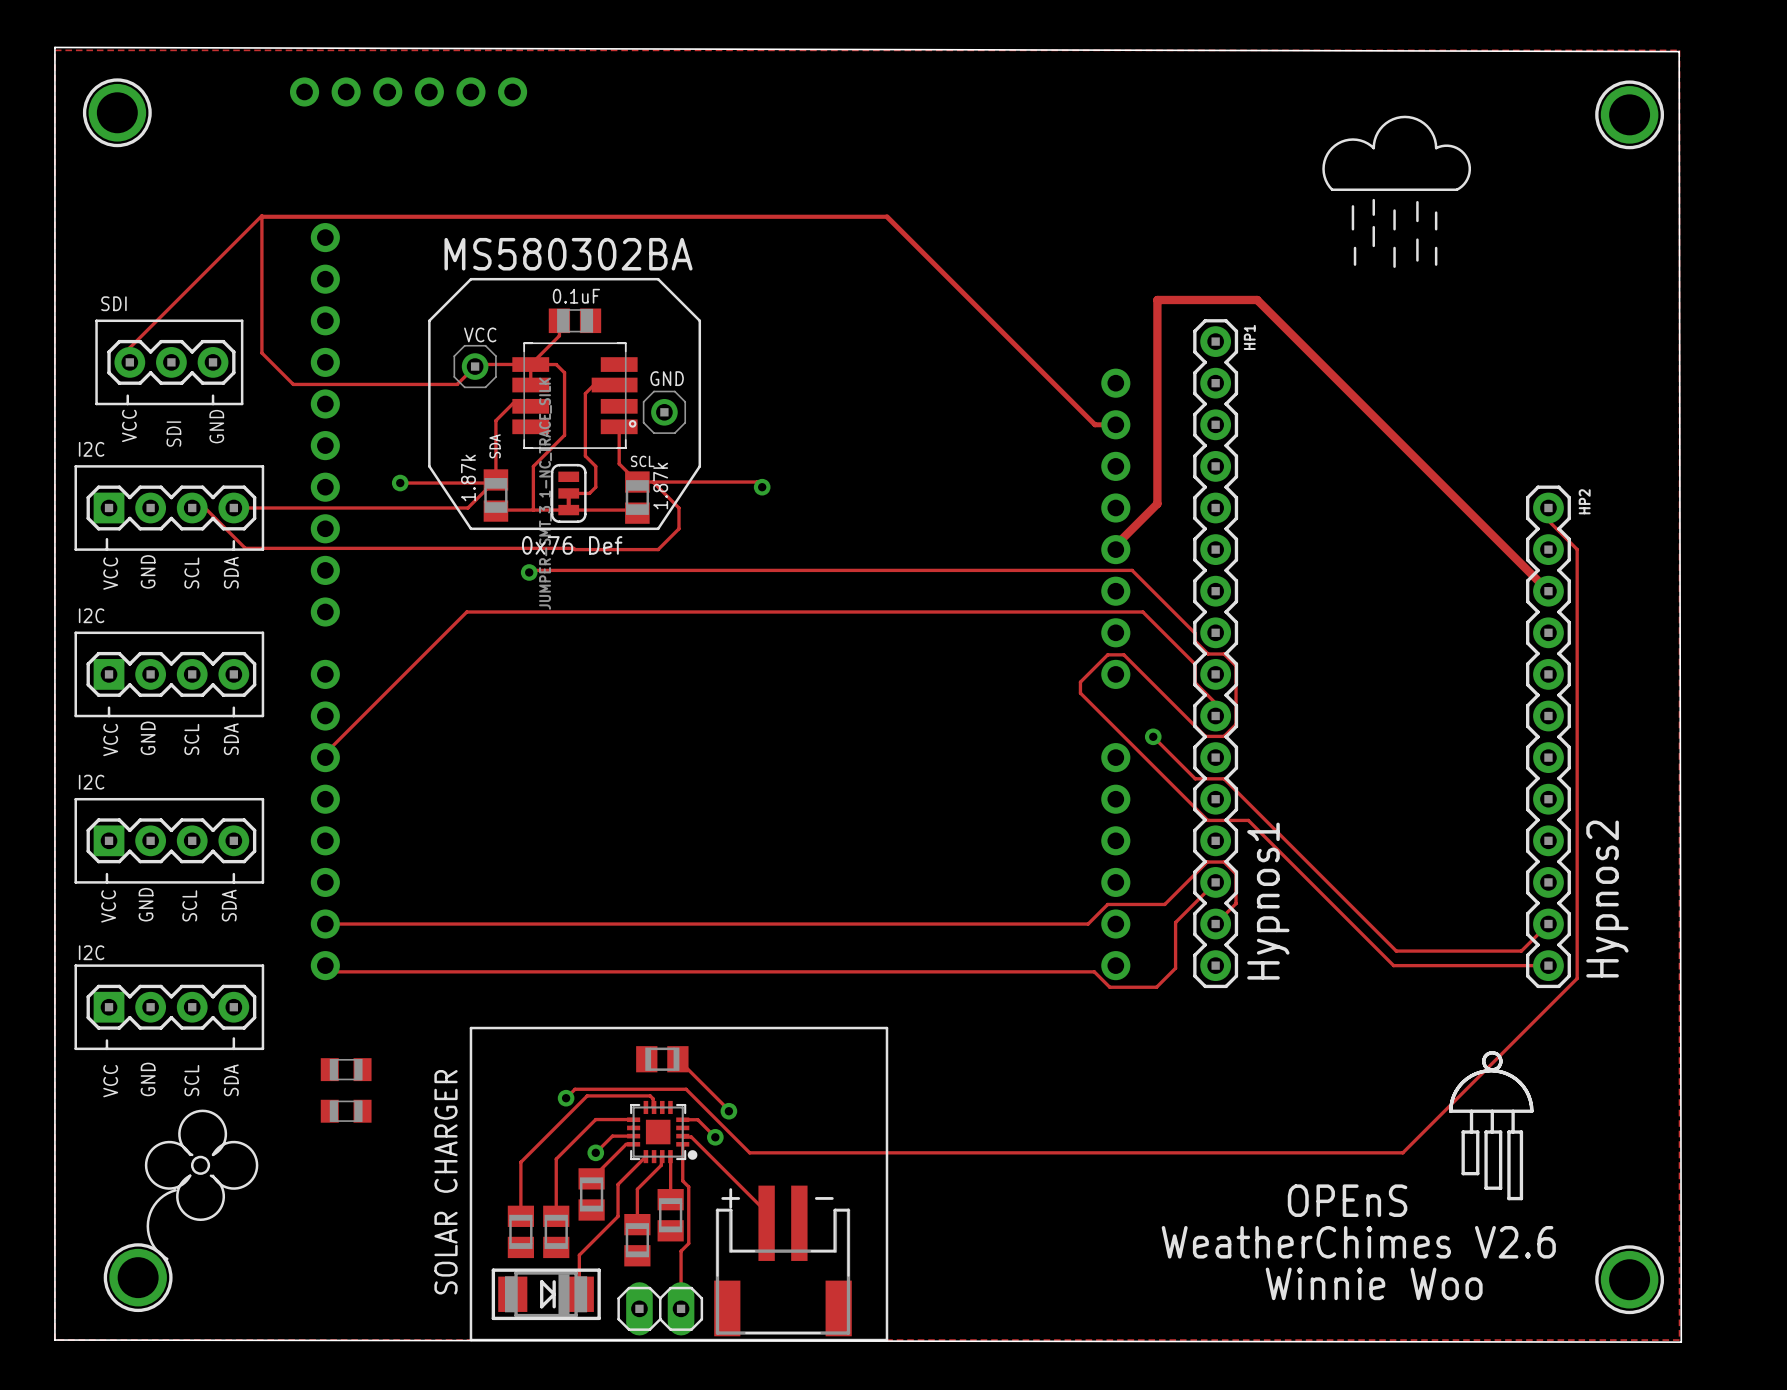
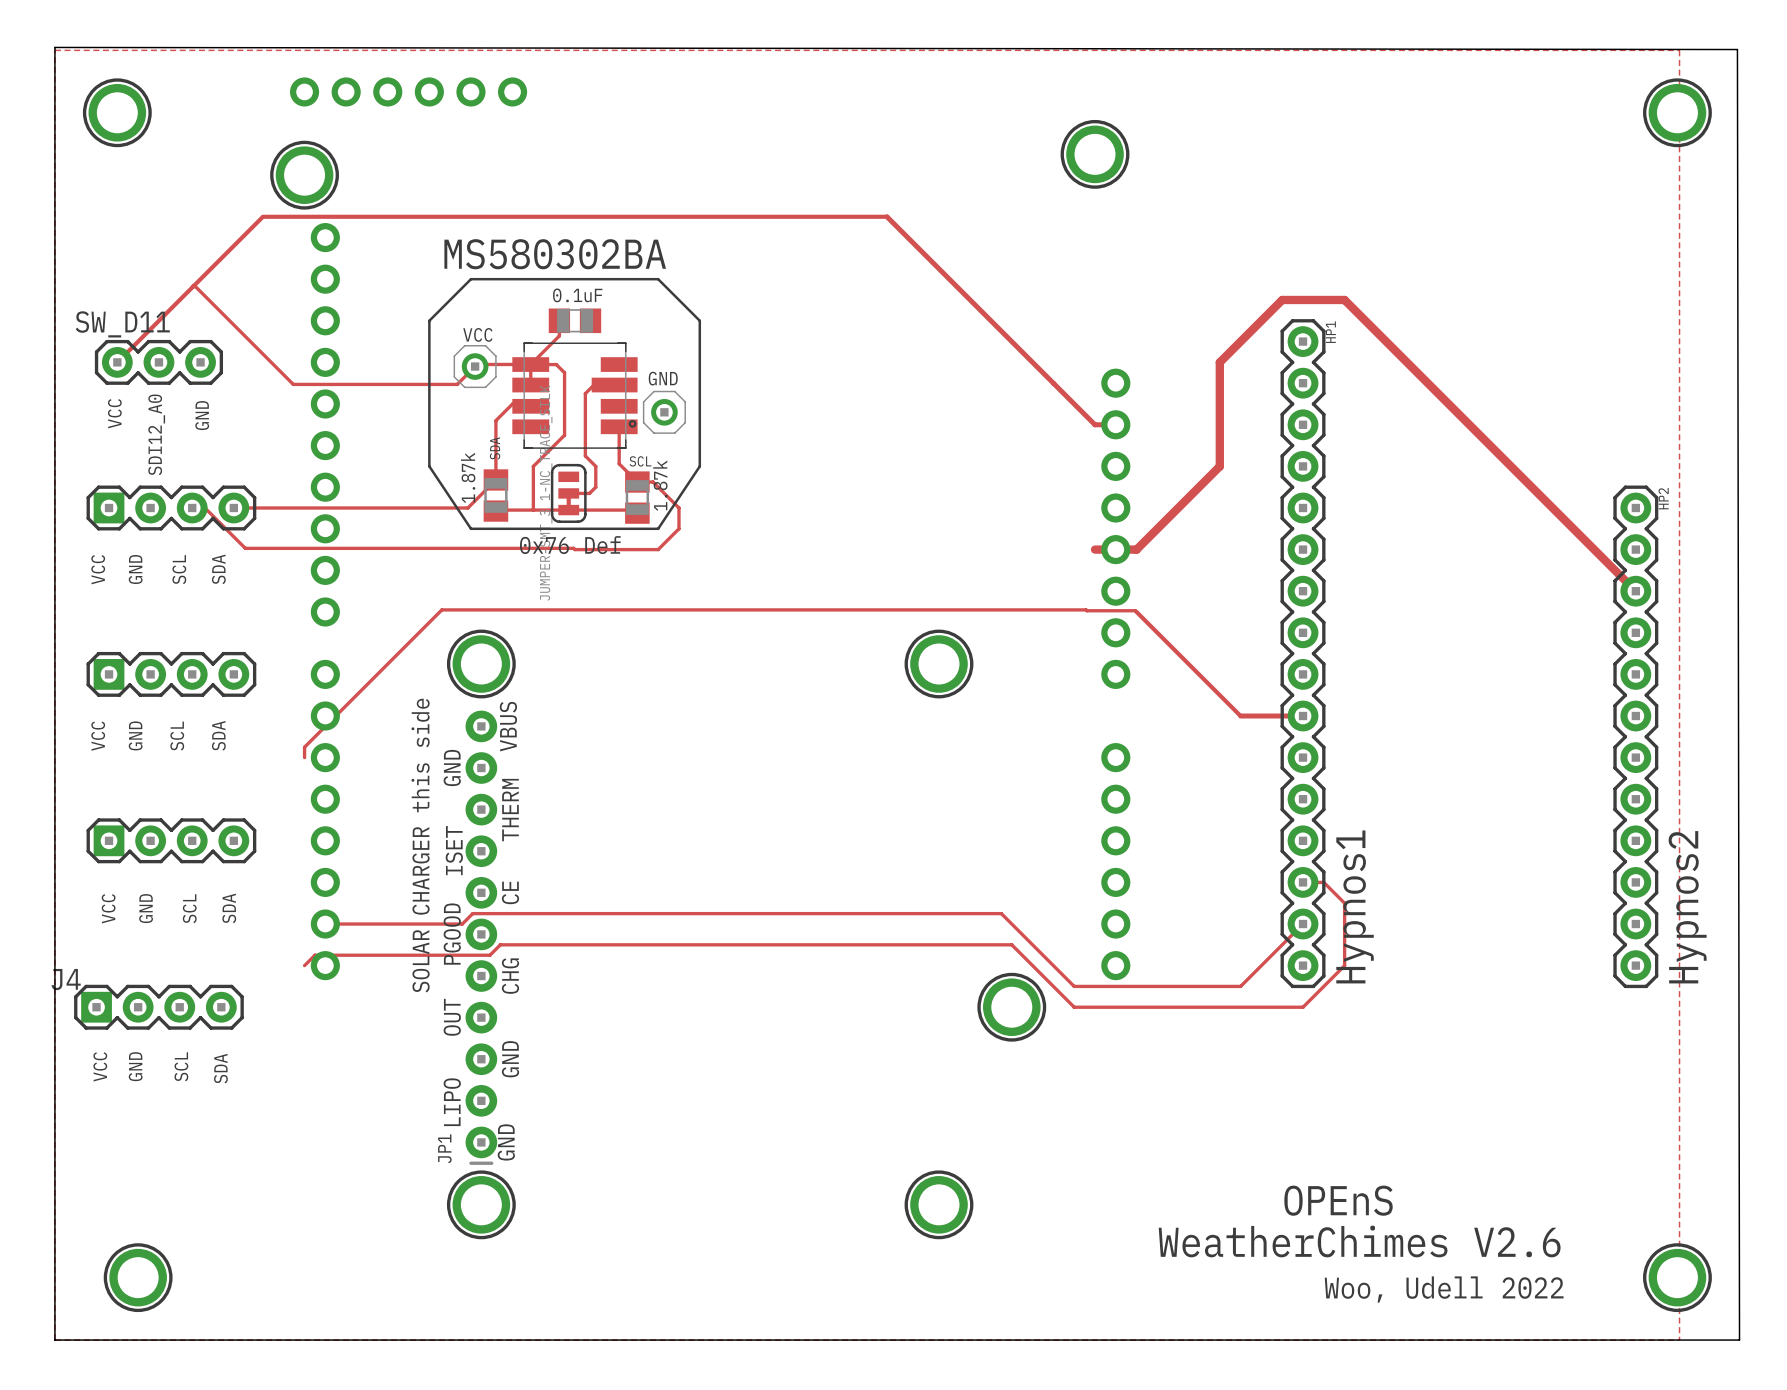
board edge: (54, 47) (1679, 51) (1681, 1342) (54, 1340) -> (54, 47) (1737, 49) (1739, 1340) (54, 1340)
part position: (1629, 114) -> (1677, 112)
line: (1373, 148) (1377, 132) (1385, 123) (1396, 117) (1413, 117) (1420, 121) (1429, 129) (1435, 140) (1436, 148) (1450, 146) (1463, 153) (1469, 164) (1468, 176) (1464, 184) (1456, 189) (1332, 189) (1325, 180) (1323, 168) (1325, 157) (1332, 148) (1341, 141) (1352, 139) (1364, 141) (1373, 148) -> none
part: none -> (1095, 154)
part: none -> (304, 175)
line: (1373, 200) (1373, 214) -> none
line: (1417, 202) (1417, 220) -> none
line: (1352, 206) (1352, 229) -> none
line: (1394, 210) (1394, 229) -> none
line: (1436, 212) (1436, 229) -> none
track: none -> (261, 217) (117, 362)
line: (1373, 227) (1373, 245) -> none
line: (1417, 239) (1417, 260) -> none
line: (1355, 247) (1355, 264) -> none
line: (1394, 247) (1394, 266) -> none
line: (1436, 247) (1436, 264) -> none
text position: MS580302BA (568, 254) -> MS580302BA (555, 254)
text position: 0.1uF (576, 296) -> 0.1uF (577, 295)
text: SDI (113, 303) -> none
line: (96, 320) (242, 320) (242, 403) (96, 403) (96, 320) -> none
SW_D11 name: none -> SW_D11 (122, 324)
HP1 name position: HP1 (1249, 337) -> HP1 (1330, 332)
track: (261, 353) (261, 215) (129, 347) (129, 362) -> (261, 353) (193, 286)
SW_D11 position: (171, 362) -> (158, 362)
line: (127, 395) (127, 403) -> none
line: (213, 395) (213, 403) -> none
text position: VCC (129, 425) -> VCC (114, 413)
text position: GND (216, 426) -> GND (202, 415)
text: SDI (173, 434) -> none
text: none -> SDI12_A0 (156, 434)
text: I2C (91, 449) -> none
line: (75, 466) (75, 549) (262, 549) (262, 466) (75, 466) -> none
track: (653, 482) (757, 482) (762, 487) -> none
track: (400, 483) (492, 483) -> none
via: (400, 483) -> none
via: (762, 487) -> none
HP2 name position: HP2 (1584, 501) -> HP2 (1663, 498)
track: (1548, 507) (1548, 520) (1577, 549) (1577, 978) (1402, 1152) (749, 1152) (686, 1089) (575, 1089) (566, 1098) -> none
line: (106, 539) (106, 549) -> none
line: (233, 541) (233, 549) -> none
track: none -> (1095, 549) (1136, 549) (1219, 466) (1219, 362) (1282, 299) (1344, 299) (1635, 591)
track: (1115, 549) (1115, 545) (1157, 503) (1157, 299) (1257, 299) (1548, 591) -> none
text position: GND (148, 571) -> GND (135, 569)
text position: SDA (231, 572) -> SDA (218, 569)
track: (529, 572) (531, 570) (1132, 570) (1195, 633) (1195, 641) (1208, 654) (1224, 654) (1236, 665) (1236, 724) (1224, 736) (1205, 736) (1123, 654) (1107, 654) (1080, 682) (1080, 693) (1207, 820) (1248, 820) (1393, 965) (1548, 965) -> none
via: (529, 572) -> none
text position: VCC (110, 573) -> VCC (98, 569)
text position: SCL (191, 573) -> SCL (179, 569)
text: I2C (91, 615) -> none
line: (75, 632) (75, 716) (262, 716) (262, 632) (75, 632) -> none
HP1 position: (1215, 653) -> (1303, 653)
part: none -> (481, 664)
part: none -> (938, 664)
track: (1215, 703) (1215, 716) (1215, 703) (1195, 682) (1195, 664) (1142, 612) (466, 612) (325, 753) (325, 757) -> none
line: (109, 707) (109, 716) -> none
line: (233, 707) (233, 716) -> none
track: none -> (1303, 716) (1240, 716) (1135, 610) (441, 609) (304, 747) (304, 757)
text: none -> VBUS (508, 726)
track: (1153, 736) (1195, 778) (1224, 778) (1396, 951) (1521, 951) (1548, 924) -> none
via: (1153, 736) -> none
HP2 position: (1548, 736) -> (1635, 736)
text position: GND (148, 738) -> GND (135, 735)
text position: SCL (191, 739) -> SCL (177, 736)
text position: SDA (231, 739) -> SDA (218, 735)
text position: VCC (110, 740) -> VCC (98, 736)
text: none -> GND (452, 768)
text: I2C (91, 782) -> none
line: (75, 799) (75, 882) (262, 882) (262, 799) (75, 799) -> none
text: none -> THERM (510, 810)
text: none -> SOLAR CHARGER this side (420, 845)
text: none -> ISET (454, 850)
line: (106, 874) (106, 882) -> none
line: (233, 874) (233, 882) -> none
track: (1215, 882) (1175, 922) (1175, 968) (1156, 987) (1109, 987) (1094, 971) (331, 971) -> none
track: none -> (1303, 882) (1323, 882) (1344, 903) (1344, 965) (1303, 1007) (1074, 1007) (1011, 944) (500, 944) (489, 955) (314, 955) (304, 965)
text: none -> CE (510, 892)
text position: Hypnos2 (1607, 899) -> Hypnos2 (1687, 907)
text position: Hypnos1 (1268, 901) -> Hypnos1 (1355, 906)
track: (462, 924) (1088, 924) (1107, 904) (1164, 904) (1207, 862) (1224, 862) (1236, 873) (1236, 903) (1215, 924) -> (462, 924) (472, 913) (1001, 913) (1074, 986) (1240, 986) (1303, 924)
text: none -> PGOOD (452, 934)
JP1: none -> (481, 937)
text: I2C (91, 952) -> none
line: (75, 965) (262, 965) (262, 1048) (75, 1048) (75, 965) -> none
text: none -> CHG (510, 976)
J4 name: none -> J4 (66, 979)
J4 position: (171, 1007) -> (158, 1007)
part: none -> (1011, 1007)
text: none -> OUT (452, 1017)
line: (470, 1028) (886, 1028) (886, 1340) (470, 1340) (470, 1028) -> none
line: (233, 1038) (233, 1048) -> none
line: (106, 1040) (106, 1048) -> none
drawing: [1482, 1051, 1503, 1072] -> none
text: none -> GND (510, 1059)
part: (662, 1059) -> none
track: (677, 1059) (728, 1111) -> none
part: (346, 1069) -> none
text position: GND (148, 1079) -> GND (135, 1066)
text position: SCL (191, 1080) -> SCL (181, 1066)
text position: SDA (231, 1080) -> SDA (220, 1068)
text position: VCC (110, 1081) -> VCC (100, 1066)
via: (566, 1098) -> none
text: none -> LIPO (452, 1102)
track: (654, 1107) (653, 1098) (650, 1095) (587, 1095) (520, 1162) (520, 1216) -> none
part: (346, 1111) -> none
via: (728, 1111) -> none
line: (1450, 1111) (1531, 1111) -> none
line: (1450, 1111) (1453, 1095) (1462, 1082) (1475, 1073) (1491, 1070) (1506, 1073) (1519, 1082) (1528, 1095) (1531, 1111) -> none
line: (1450, 1111) (1453, 1095) (1462, 1082) (1475, 1073) (1491, 1070) (1506, 1073) (1519, 1082) (1528, 1095) (1531, 1111) -> none
line: (1471, 1111) (1471, 1132) -> none
line: (1492, 1111) (1492, 1132) -> none
line: (1513, 1111) (1513, 1132) -> none
track: (633, 1119) (595, 1119) (556, 1159) (556, 1216) (562, 1210) -> none
track: (682, 1119) (697, 1119) (715, 1137) -> none
part: (662, 1132) -> none
line: (1463, 1132) (1477, 1132) (1477, 1173) (1463, 1173) (1463, 1132) -> none
line: (1486, 1132) (1500, 1132) (1500, 1188) (1486, 1188) (1486, 1132) -> none
line: (1508, 1132) (1521, 1132) (1521, 1198) (1508, 1198) (1508, 1132) -> none
track: (633, 1136) (612, 1136) (595, 1152) -> none
track: (682, 1136) (691, 1137) (766, 1212) (766, 1223) -> none
via: (715, 1137) -> none
text: none -> GND (506, 1142)
track: (633, 1144) (626, 1144) (591, 1178) -> none
track: (682, 1144) (682, 1180) (688, 1186) (688, 1243) (681, 1251) (681, 1308) -> none
via: (595, 1152) -> none
line: (190, 1154) (179, 1144) (165, 1142) (152, 1149) (147, 1156) (146, 1165) (147, 1174) (152, 1181) (165, 1188) (174, 1188) (177, 1187) (179, 1186) (190, 1175) (181, 1183) (179, 1185) (178, 1188) (177, 1194) (179, 1206) (189, 1216) (197, 1219) (209, 1218) (216, 1213) (221, 1206) (223, 1197) (222, 1188) (217, 1181) (210, 1175) -> none
line: (192, 1154) (185, 1149) (180, 1141) (179, 1133) (181, 1124) (186, 1117) (193, 1112) (205, 1111) (213, 1113) (223, 1124) (225, 1136) (224, 1141) (223, 1144) (221, 1147) (213, 1154) (223, 1144) (226, 1143) (228, 1142) (237, 1142) (250, 1149) (255, 1156) (257, 1165) (255, 1174) (250, 1181) (237, 1188) (223, 1186) (213, 1175) -> none
drawing: [190, 1155, 211, 1175] -> none
track: (645, 1156) (618, 1184) (618, 1216) (579, 1255) (579, 1294) -> none
track: (662, 1156) (661, 1165) (637, 1189) (637, 1224) -> none
track: (670, 1156) (670, 1199) -> none
text: SOLAR CHARGER (446, 1182) -> none
line: (175, 1190) (167, 1193) (156, 1201) (152, 1209) (148, 1221) (148, 1230) (151, 1243) (156, 1250) (167, 1258) -> none
part: (591, 1194) -> none
part: none -> (481, 1204)
part: none -> (938, 1204)
part: (670, 1215) -> none
part: (520, 1231) -> none
part: (556, 1231) -> none
part: (637, 1240) -> none
part: (782, 1260) -> none
part position: (1629, 1279) -> (1677, 1277)
text: Winnie Woo (1374, 1283) -> none
text: none -> Woo, Udell 2022 (1444, 1289)
part: (546, 1294) -> none
part: (660, 1308) -> none

